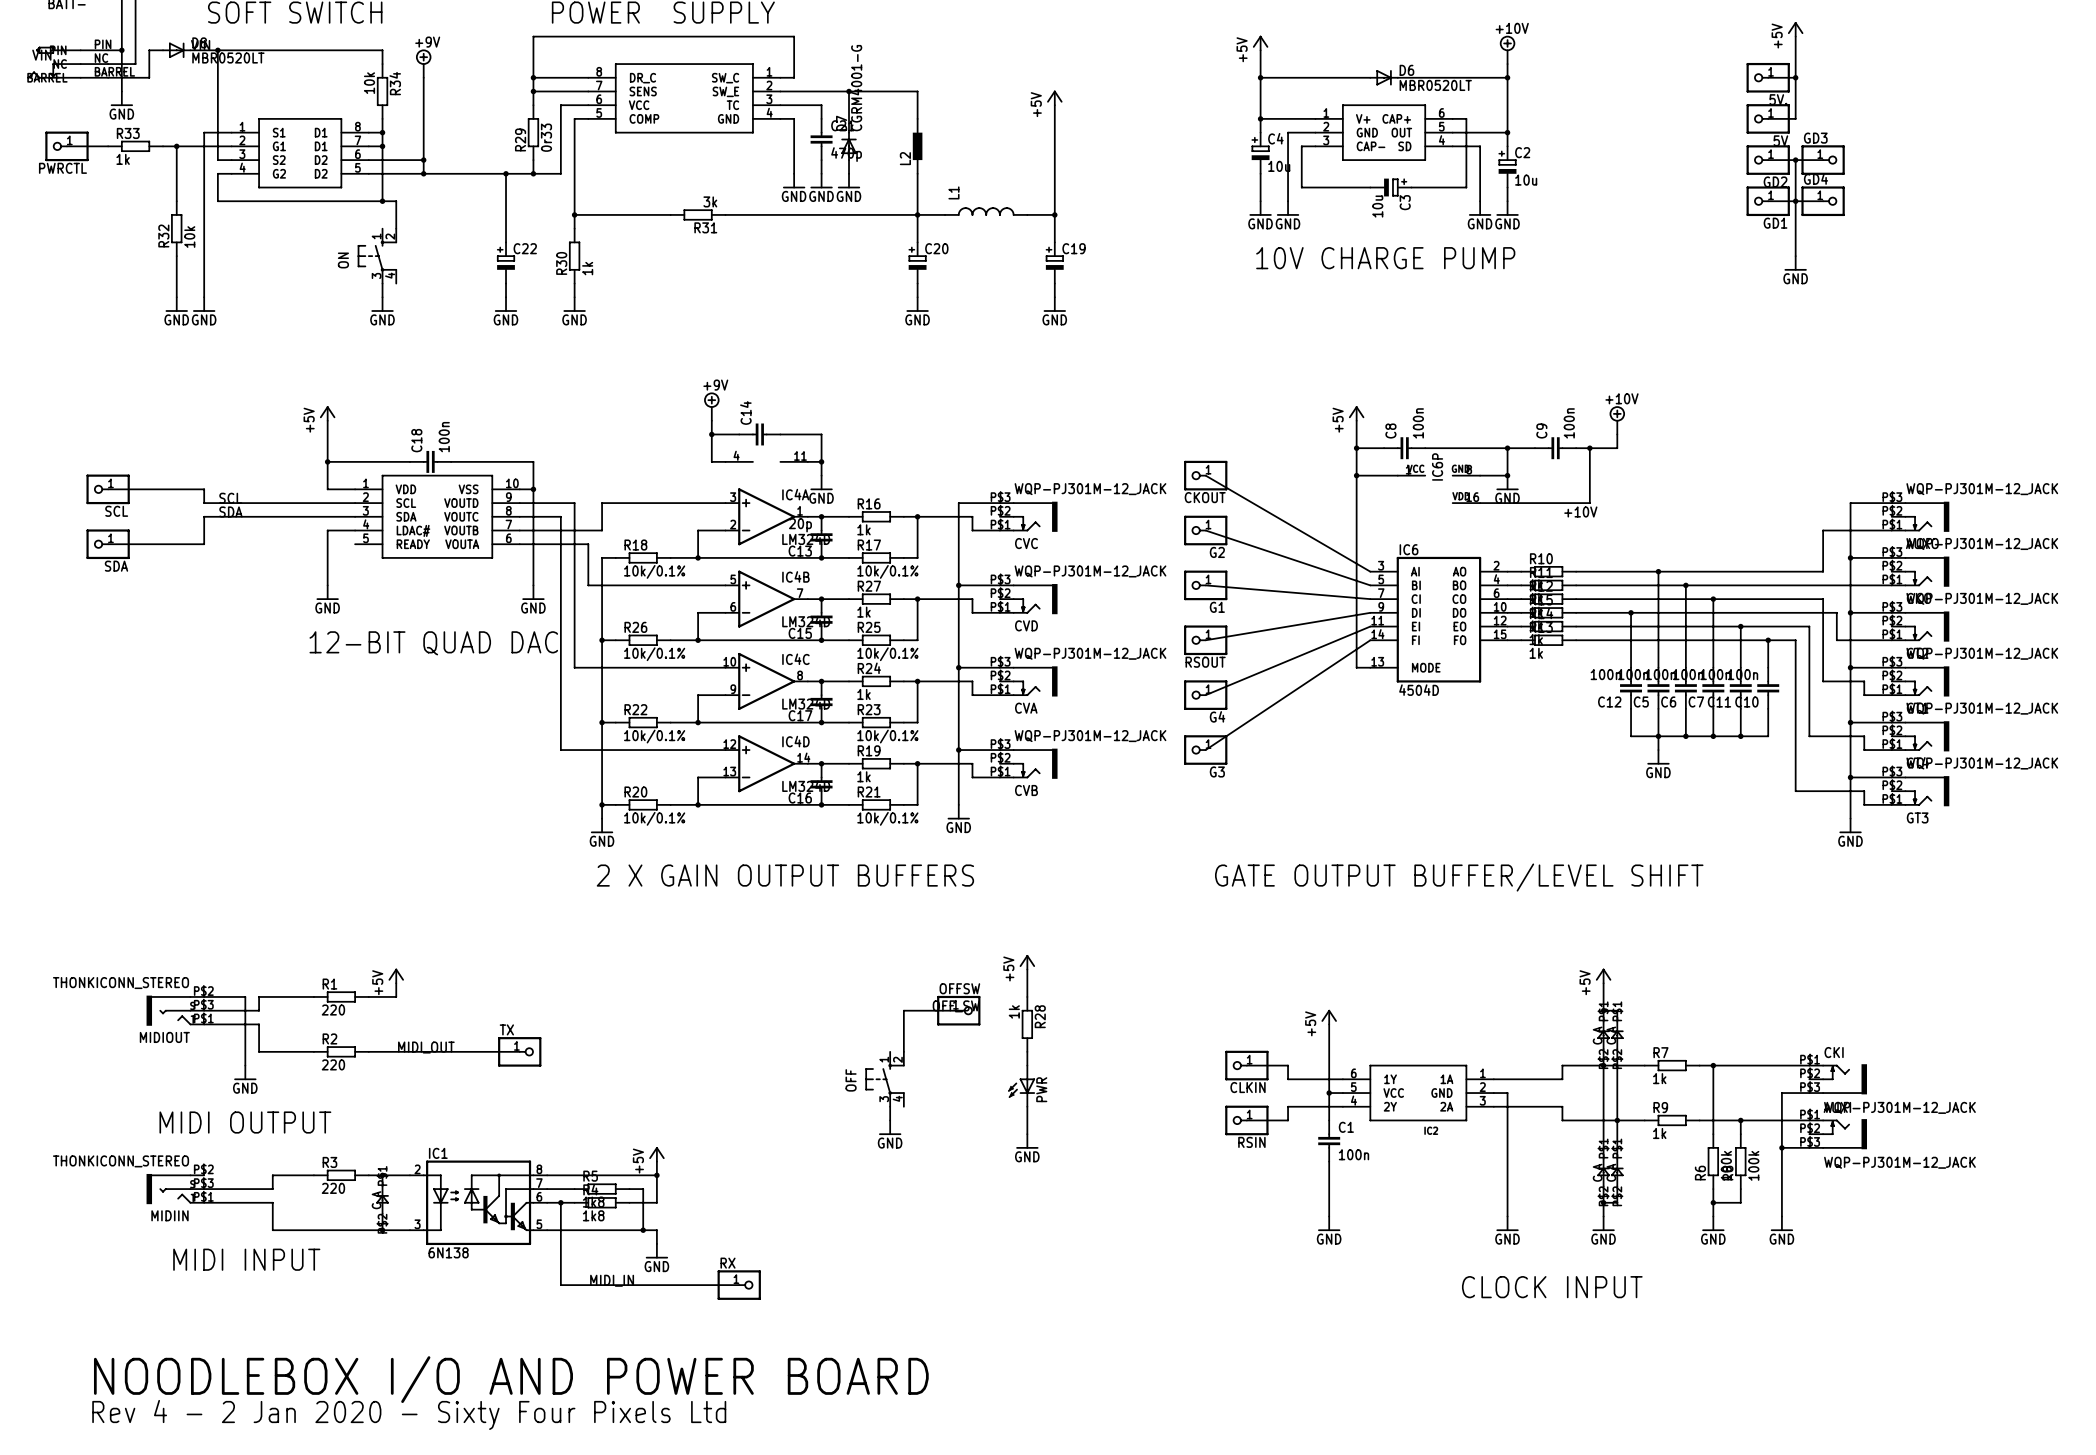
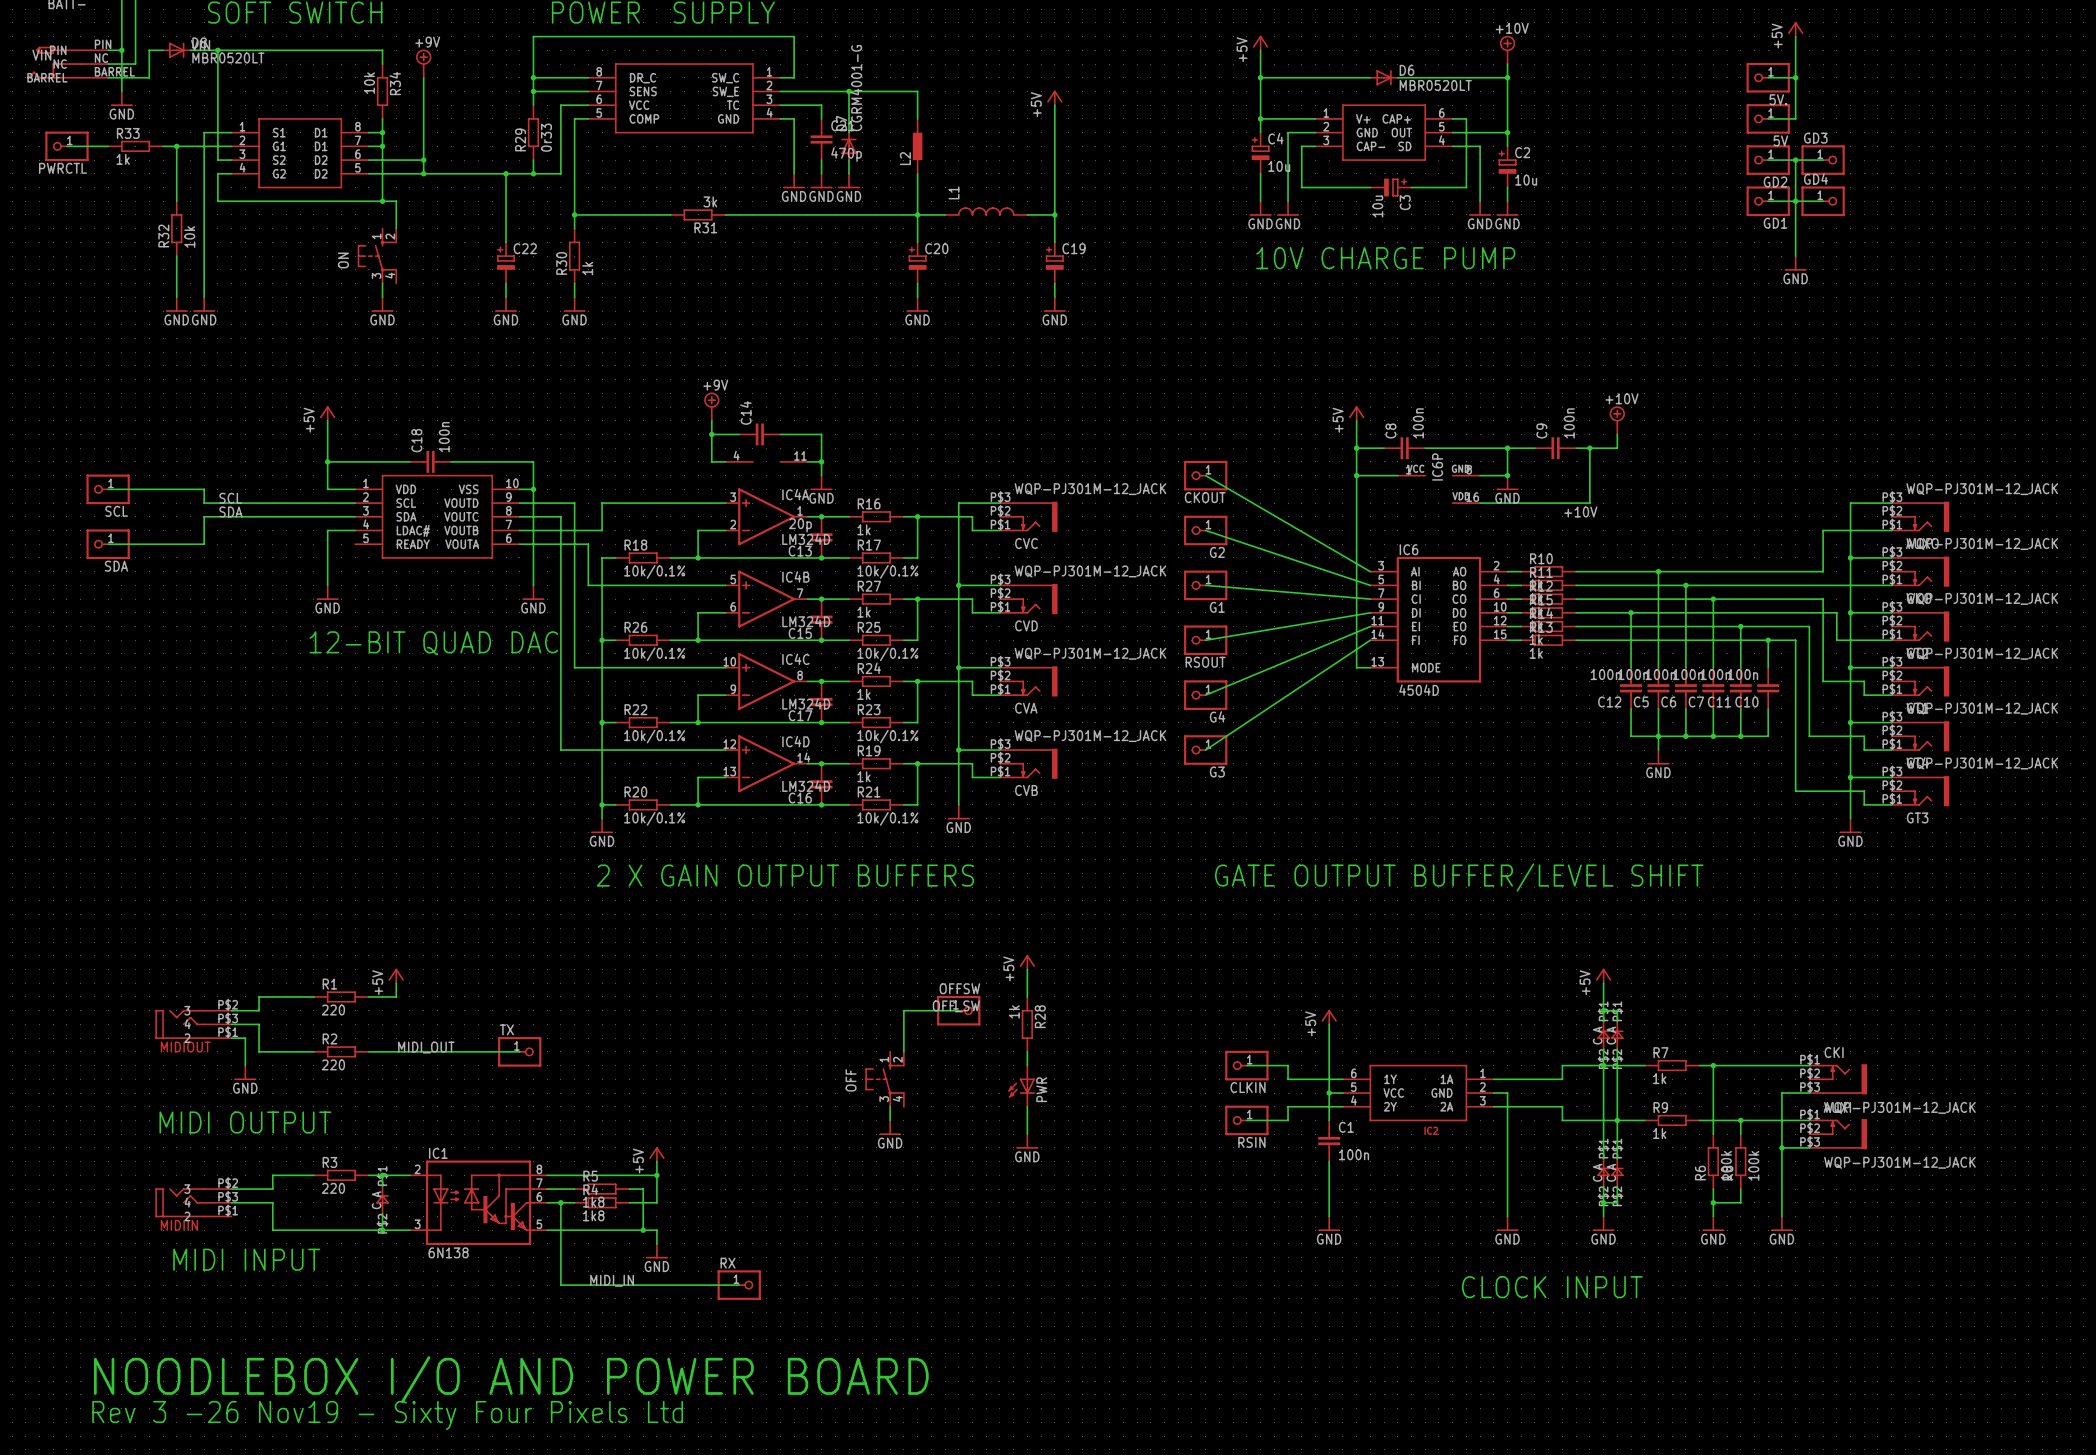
wire: (204, 996) (245, 996) (245, 1038) -> (231, 1038) (245, 1038)
MIDIOUT: THONKICONN_STEREO (175, 1010) -> none
MIDIOUT: none -> (193, 1024)
MIDIIN: THONKICONN_STEREO (175, 1189) -> none
MIDIIN: none -> (193, 1202)
text: Rev 4 - 2 Jan 2020 - Sixty Four Pixels Ltd (409, 1414) -> Rev 3 -26 Nov19 - Sixty Four Pixels Ltd (387, 1415)

